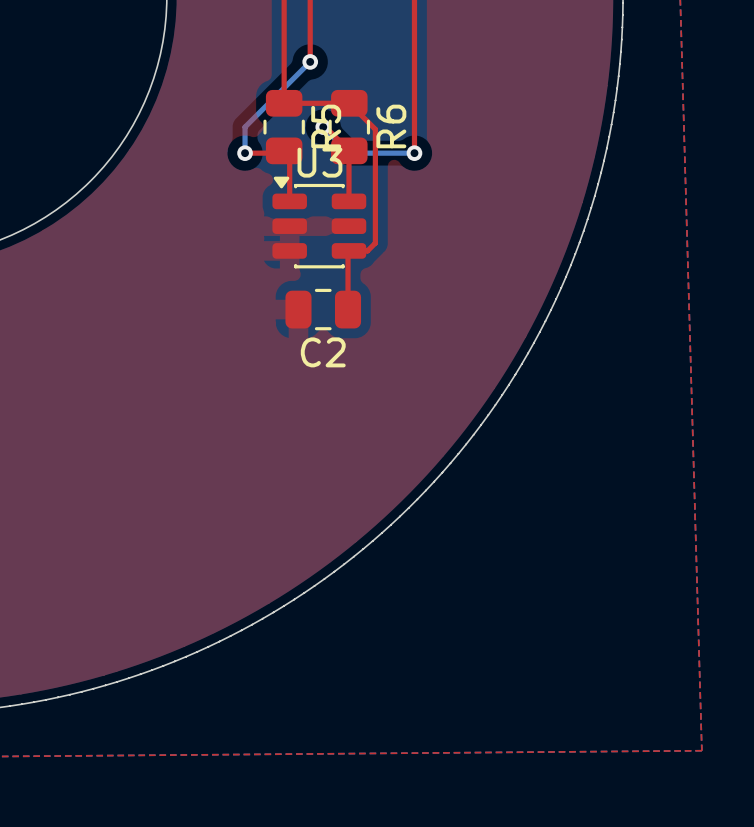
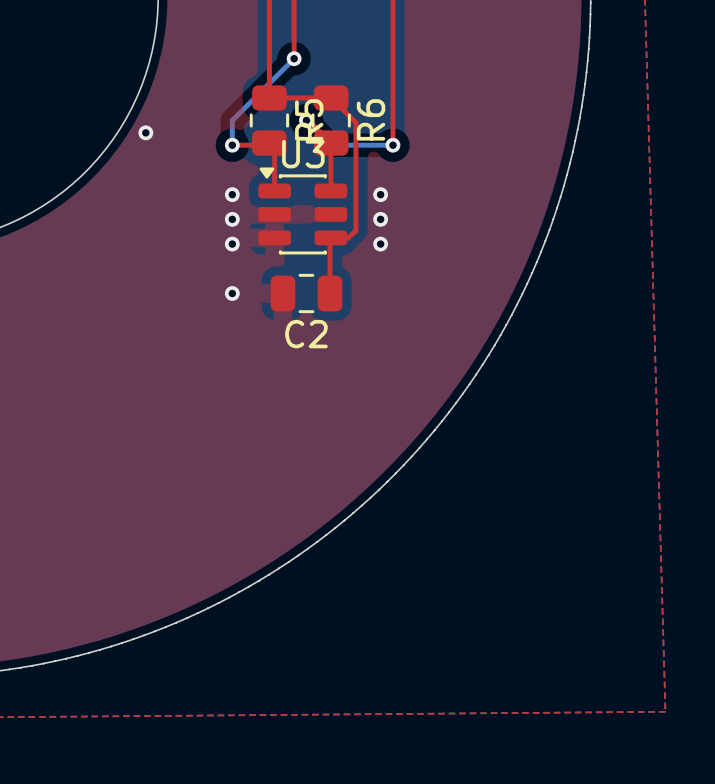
via: none -> (145, 132)
via: none -> (232, 194)
via: none -> (380, 194)
via: none -> (232, 219)
via: none -> (380, 219)
via: none -> (232, 244)
via: none -> (380, 244)
via: none -> (232, 293)

